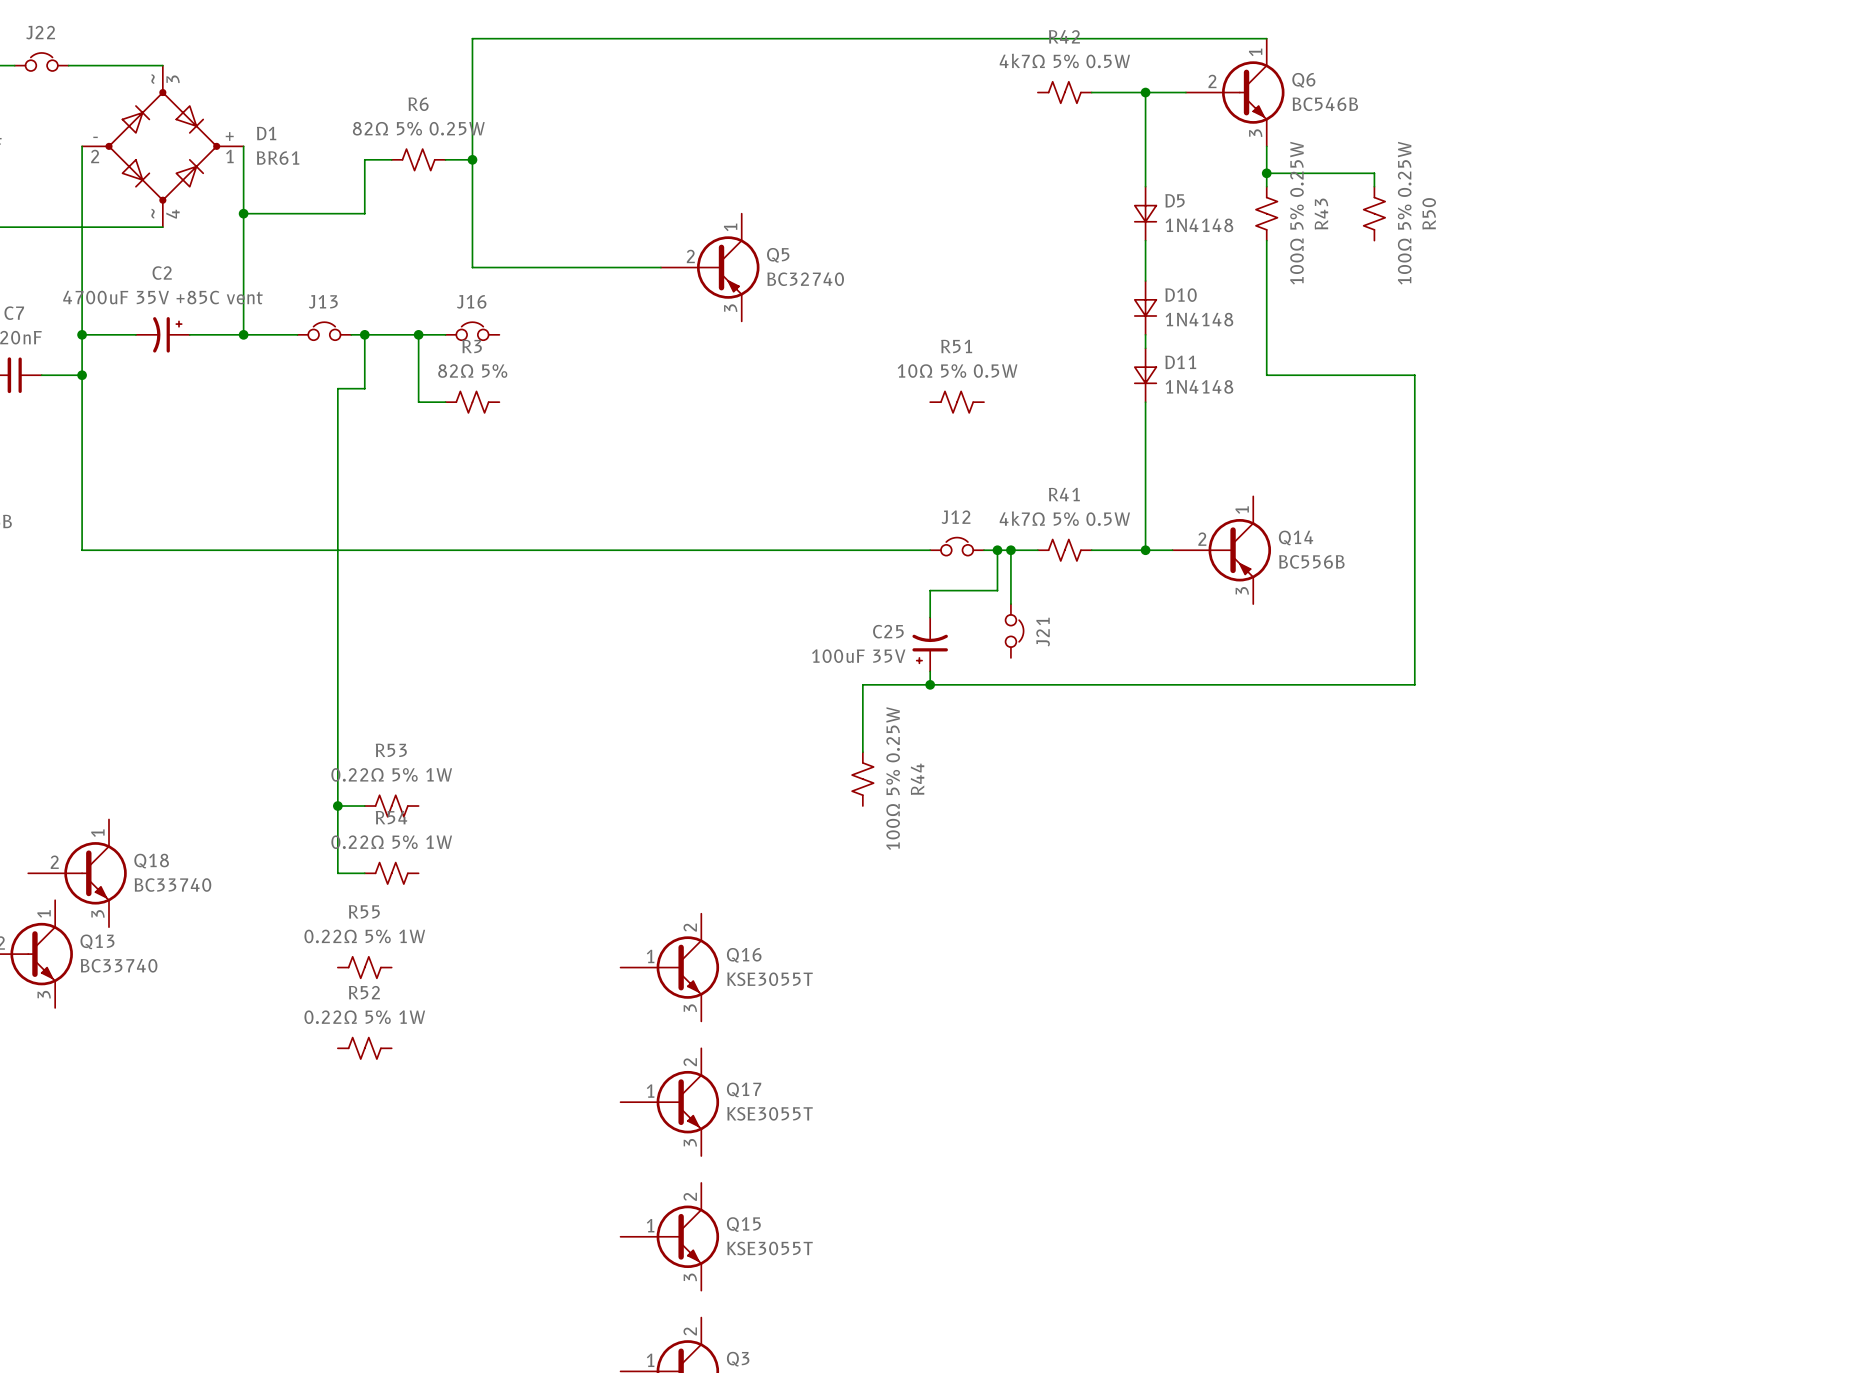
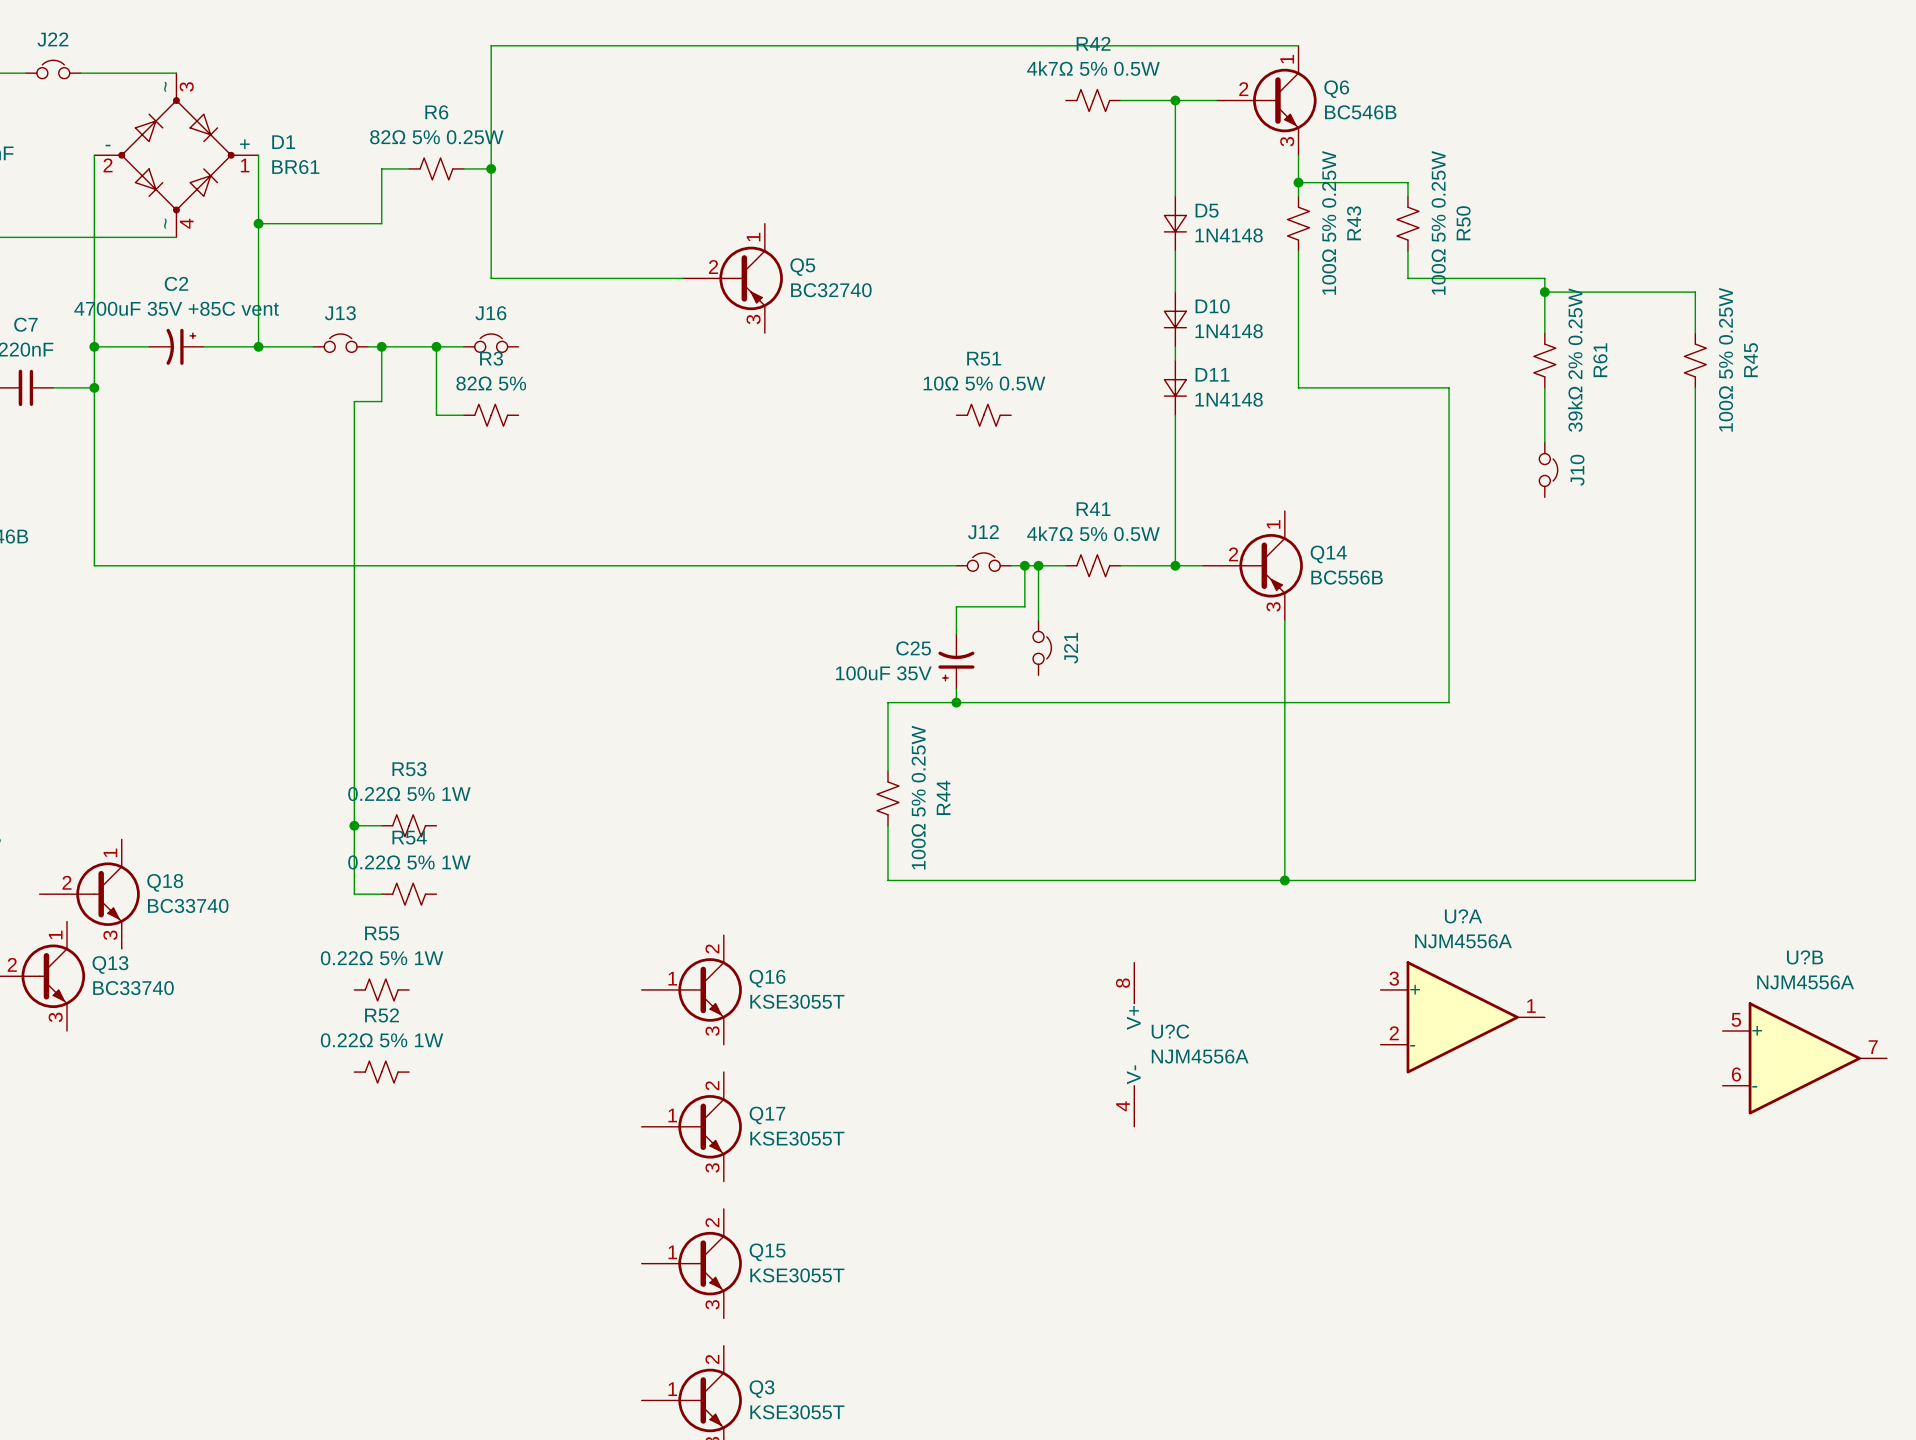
wire: none -> (1407, 251) (1407, 278) (1544, 278) (1544, 333)
wire: none -> (1544, 292) (1695, 292) (1695, 333)
junction: none -> (1544, 292)
R61: none -> 39kΩ 2% 0.25W (1544, 360)
R45: none -> 100Ω 5% 0.25W (1695, 360)
wire: none -> (1544, 387) (1544, 442)
wire: none -> (1695, 387) (1695, 880) (888, 880) (888, 825)
J10: none -> (1548, 469)
wire: none -> (1284, 620) (1284, 880)
junction: none -> (1284, 880)
U?A: none -> NJM4556A (1462, 1017)
U?C: none -> NJM4556A (1134, 1044)
U?B: none -> NJM4556A (1804, 1058)

